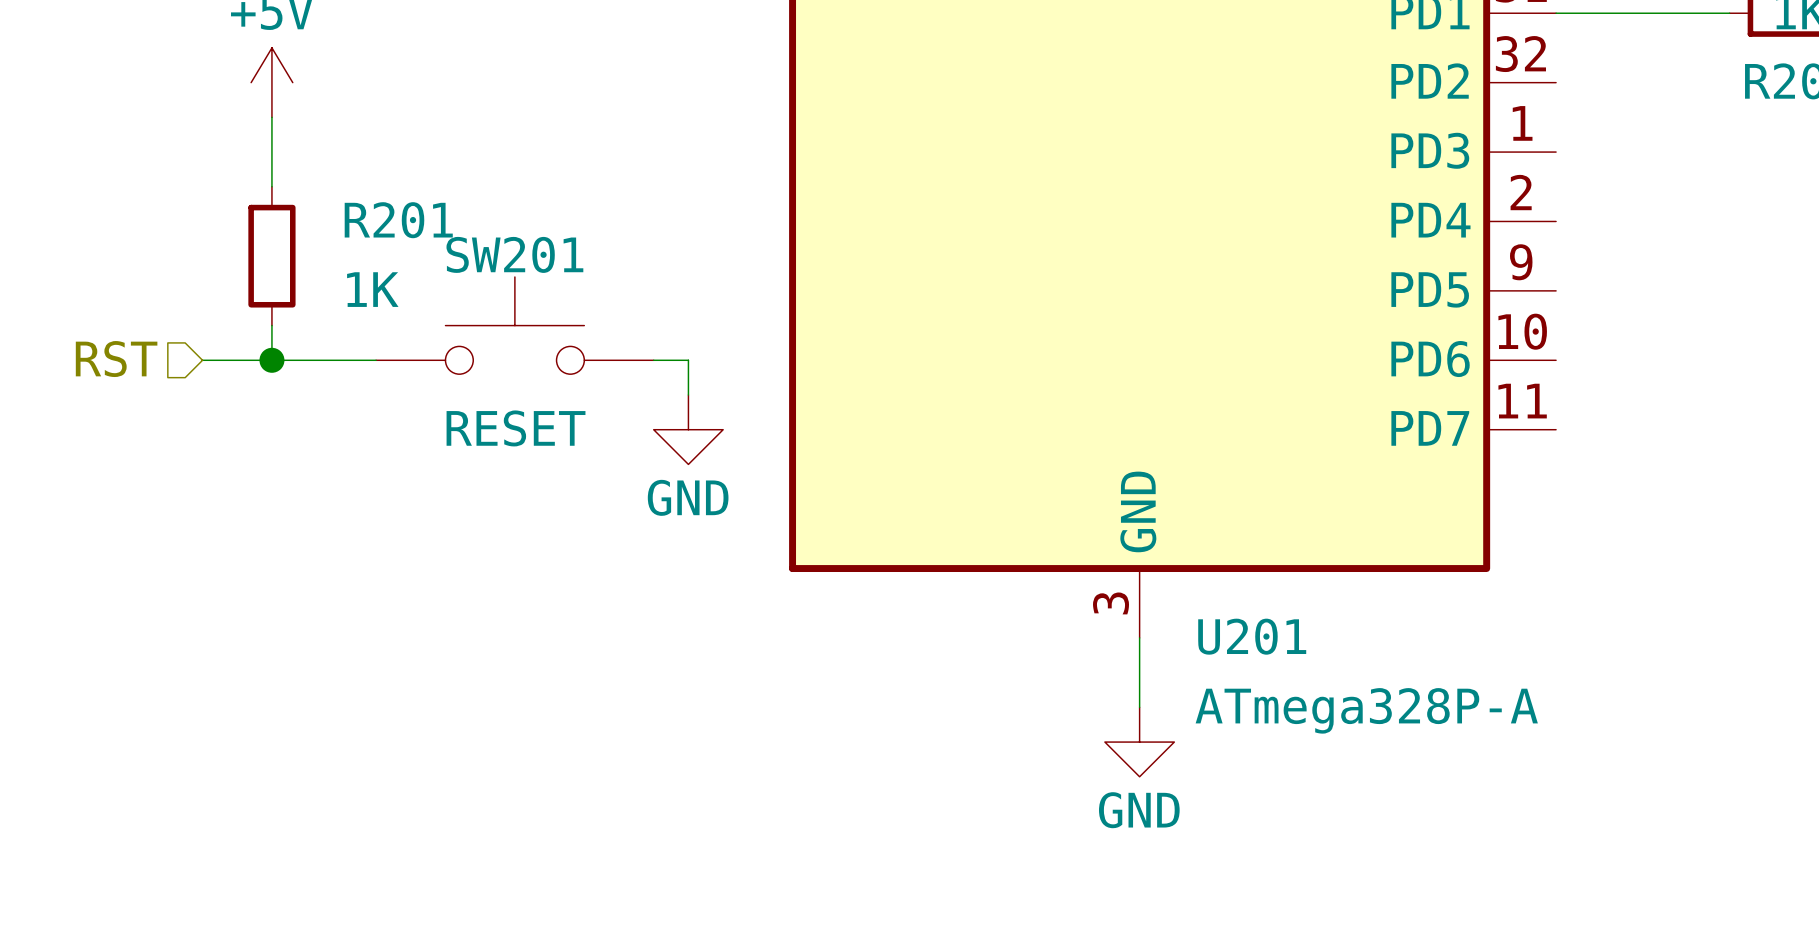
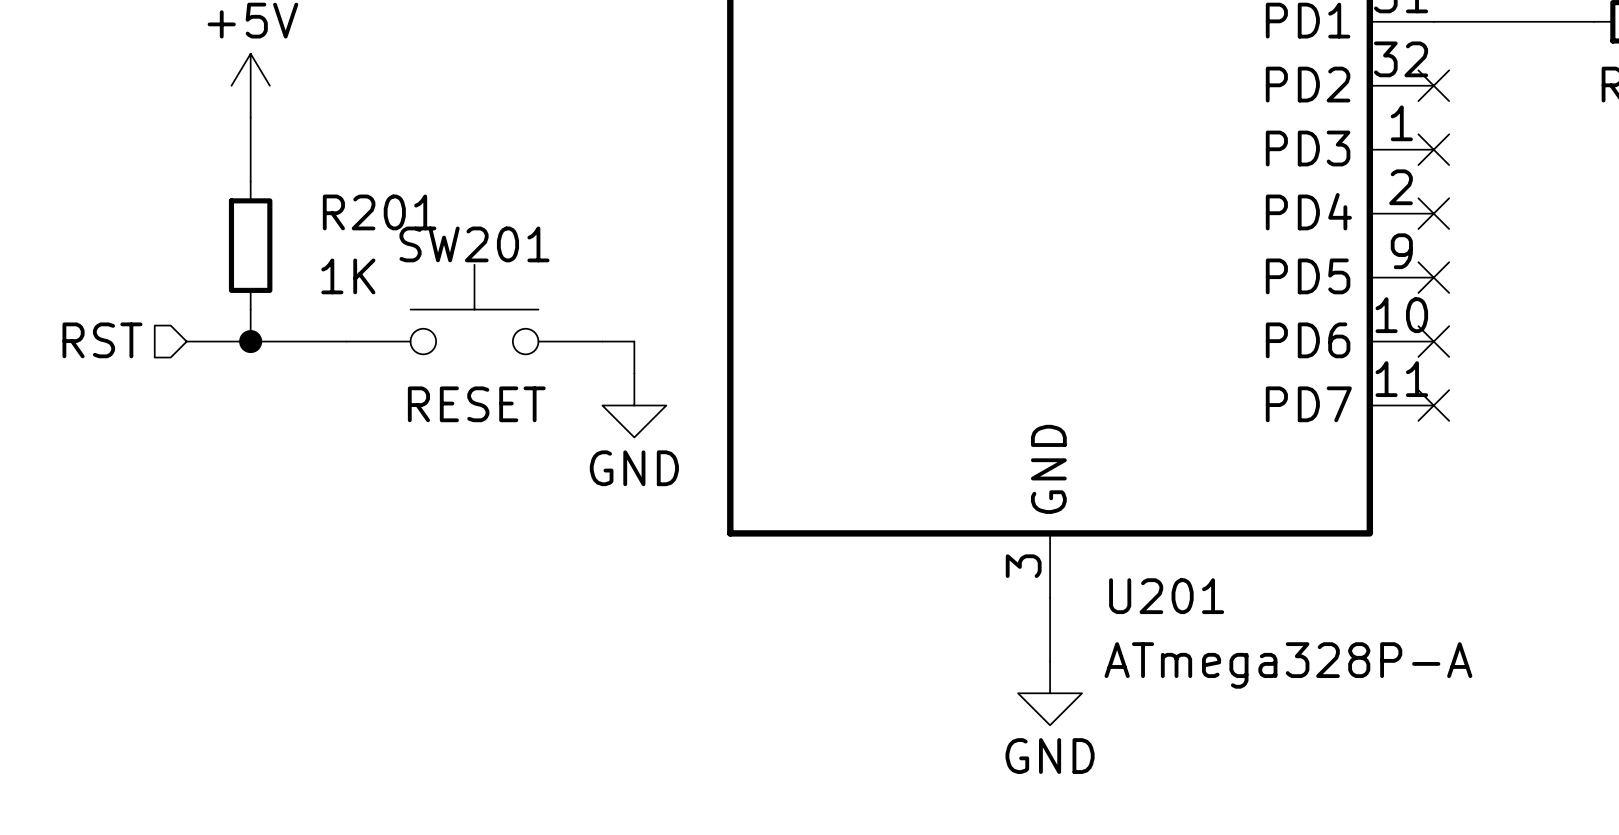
no-connect mark: none -> (1433, 85)
no-connect mark: none -> (1433, 149)
no-connect mark: none -> (1433, 213)
no-connect mark: none -> (1433, 277)
no-connect mark: none -> (1433, 341)
no-connect mark: none -> (1433, 405)

